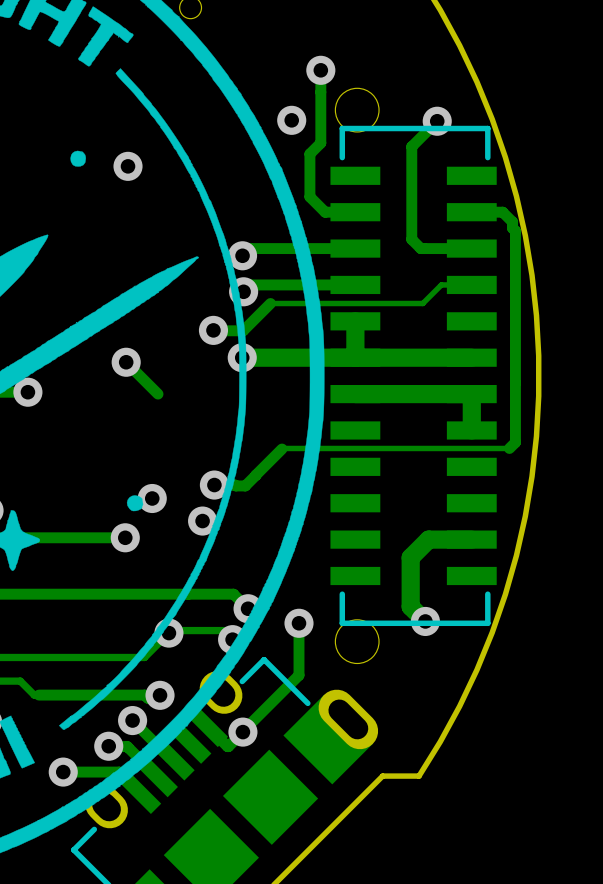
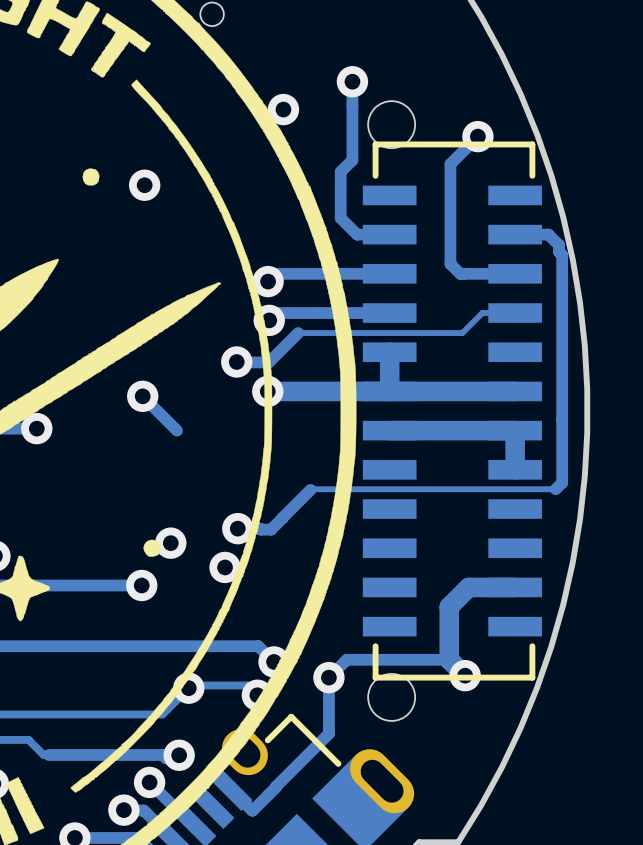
via position: (291, 120) -> (283, 109)
track: none -> (449, 659) (346, 659) (328, 677)
via: (242, 732) -> none

